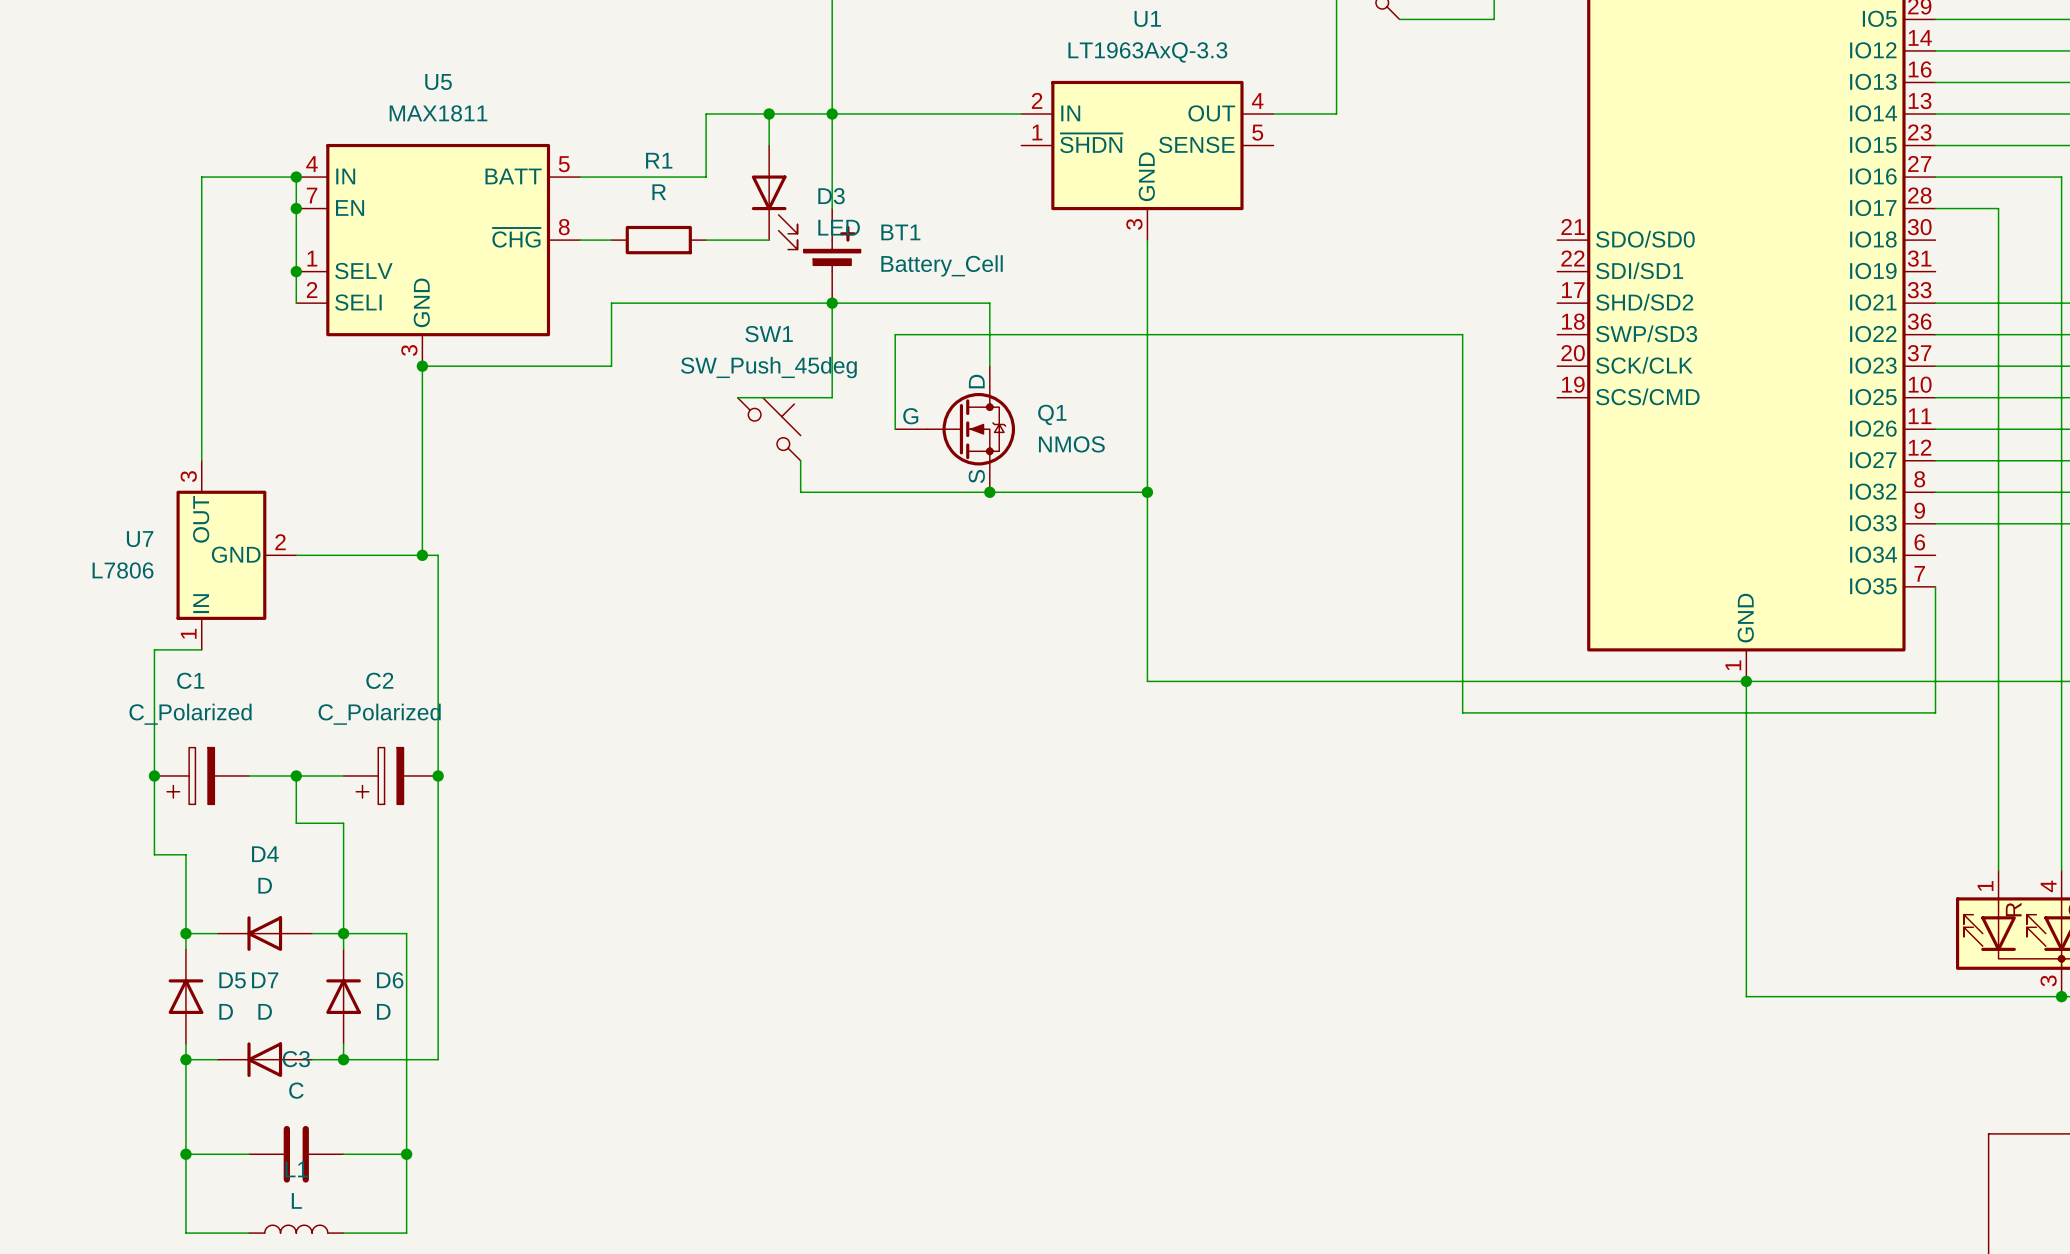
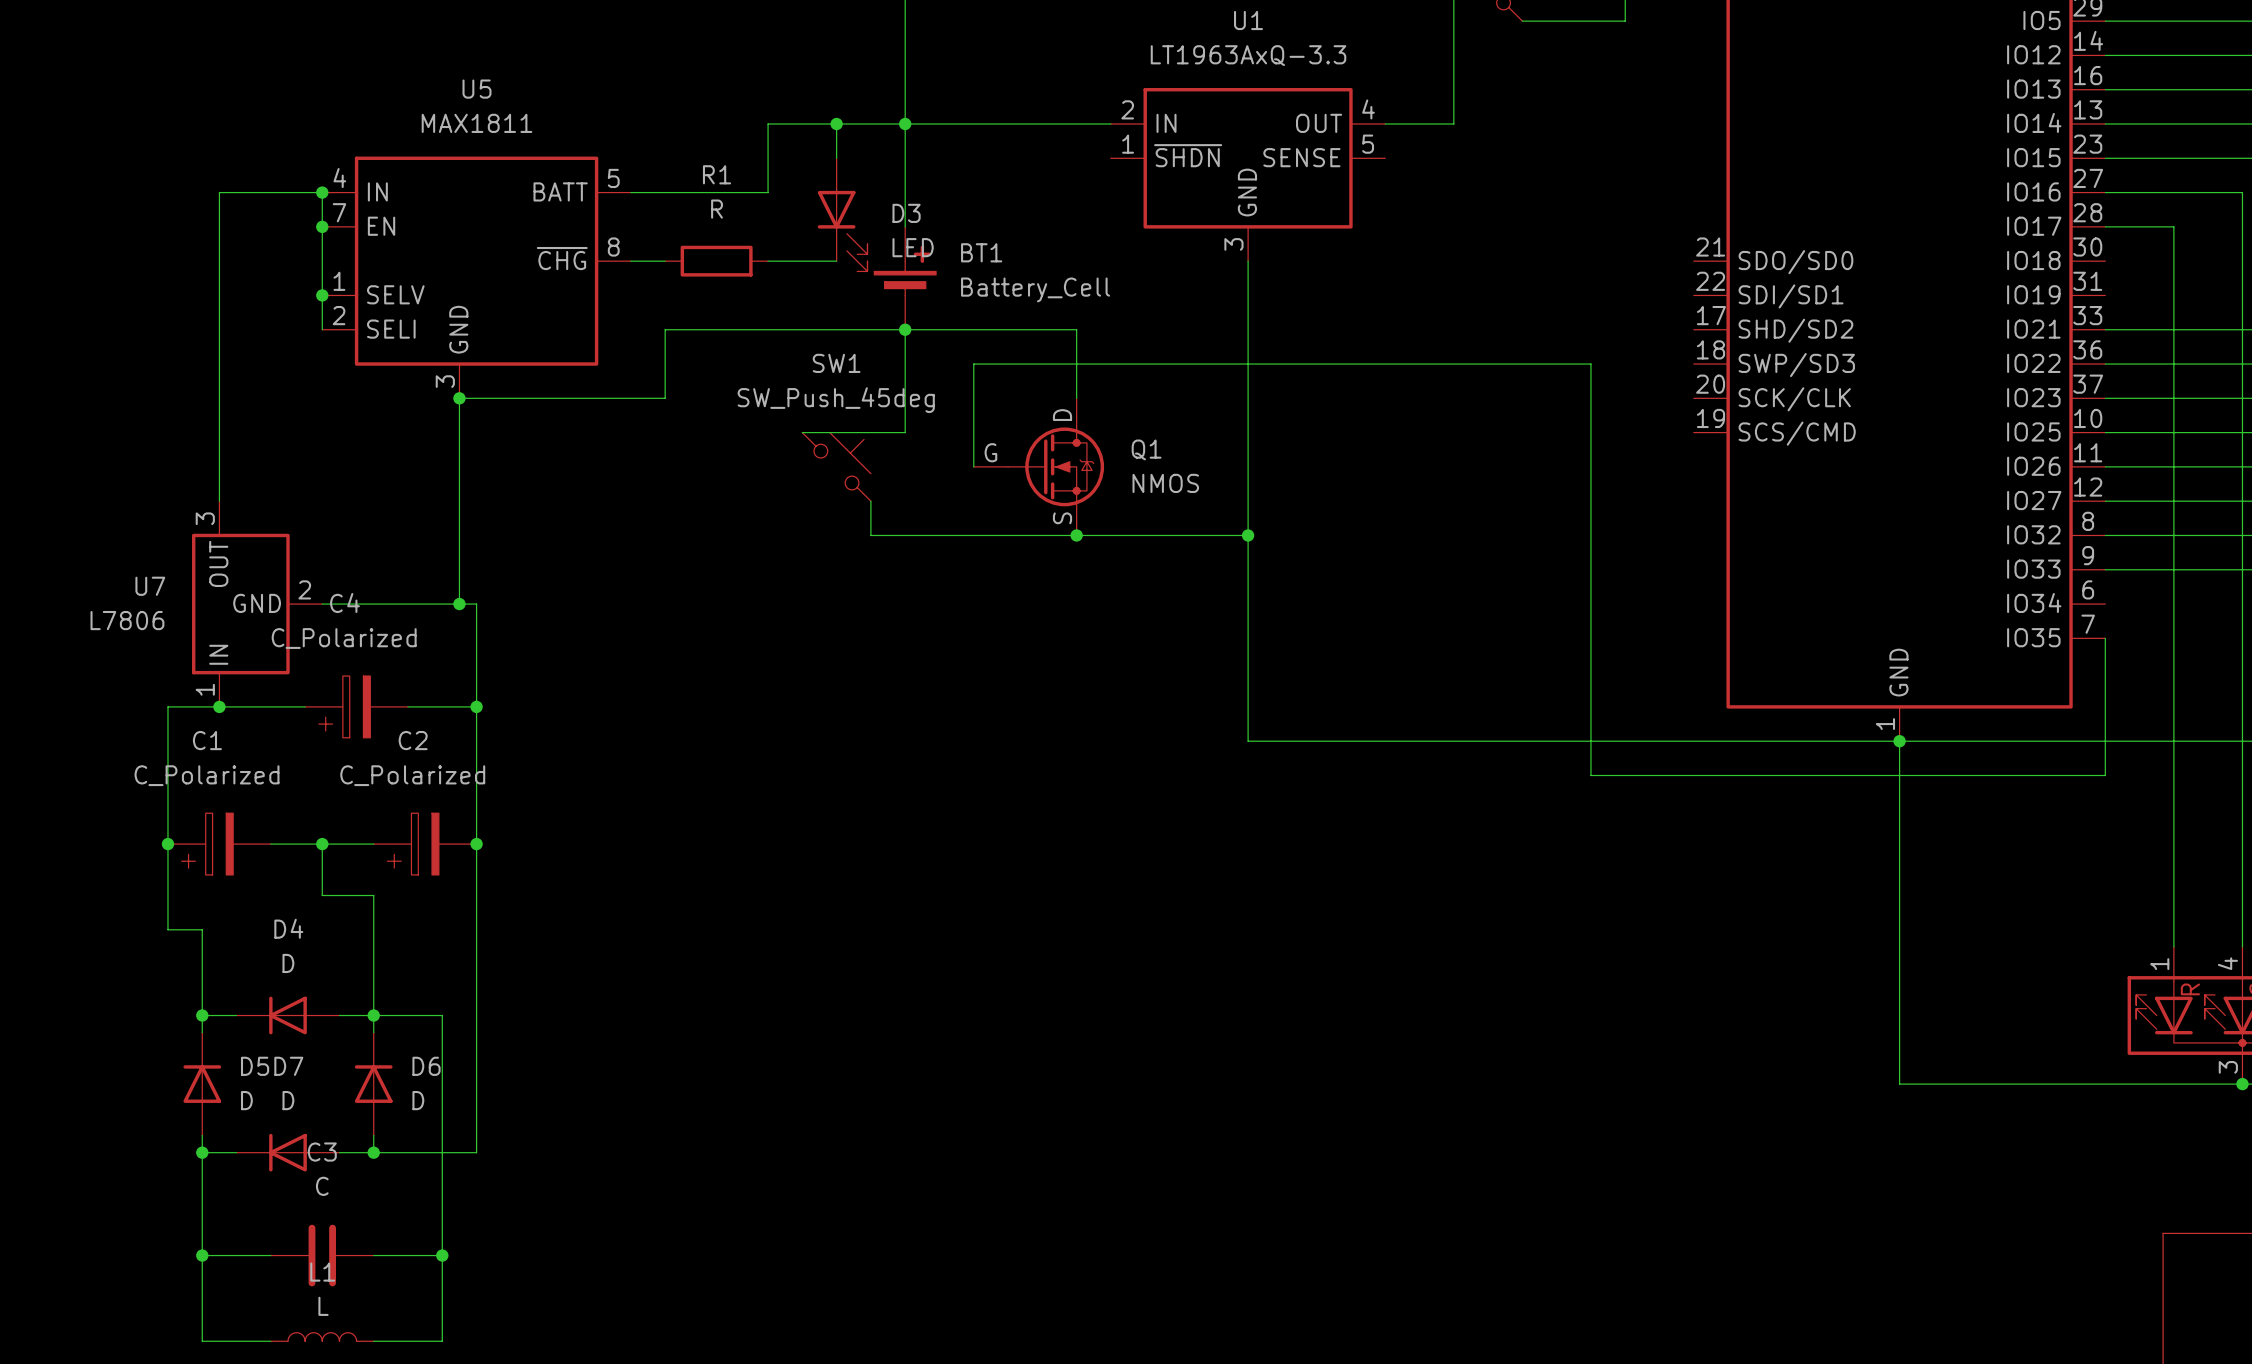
wire: none -> (219, 706) (305, 706)
junction: none -> (219, 706)
C4: none -> C_Polarized (356, 706)
wire: none -> (408, 706) (476, 706)
junction: none -> (476, 706)

